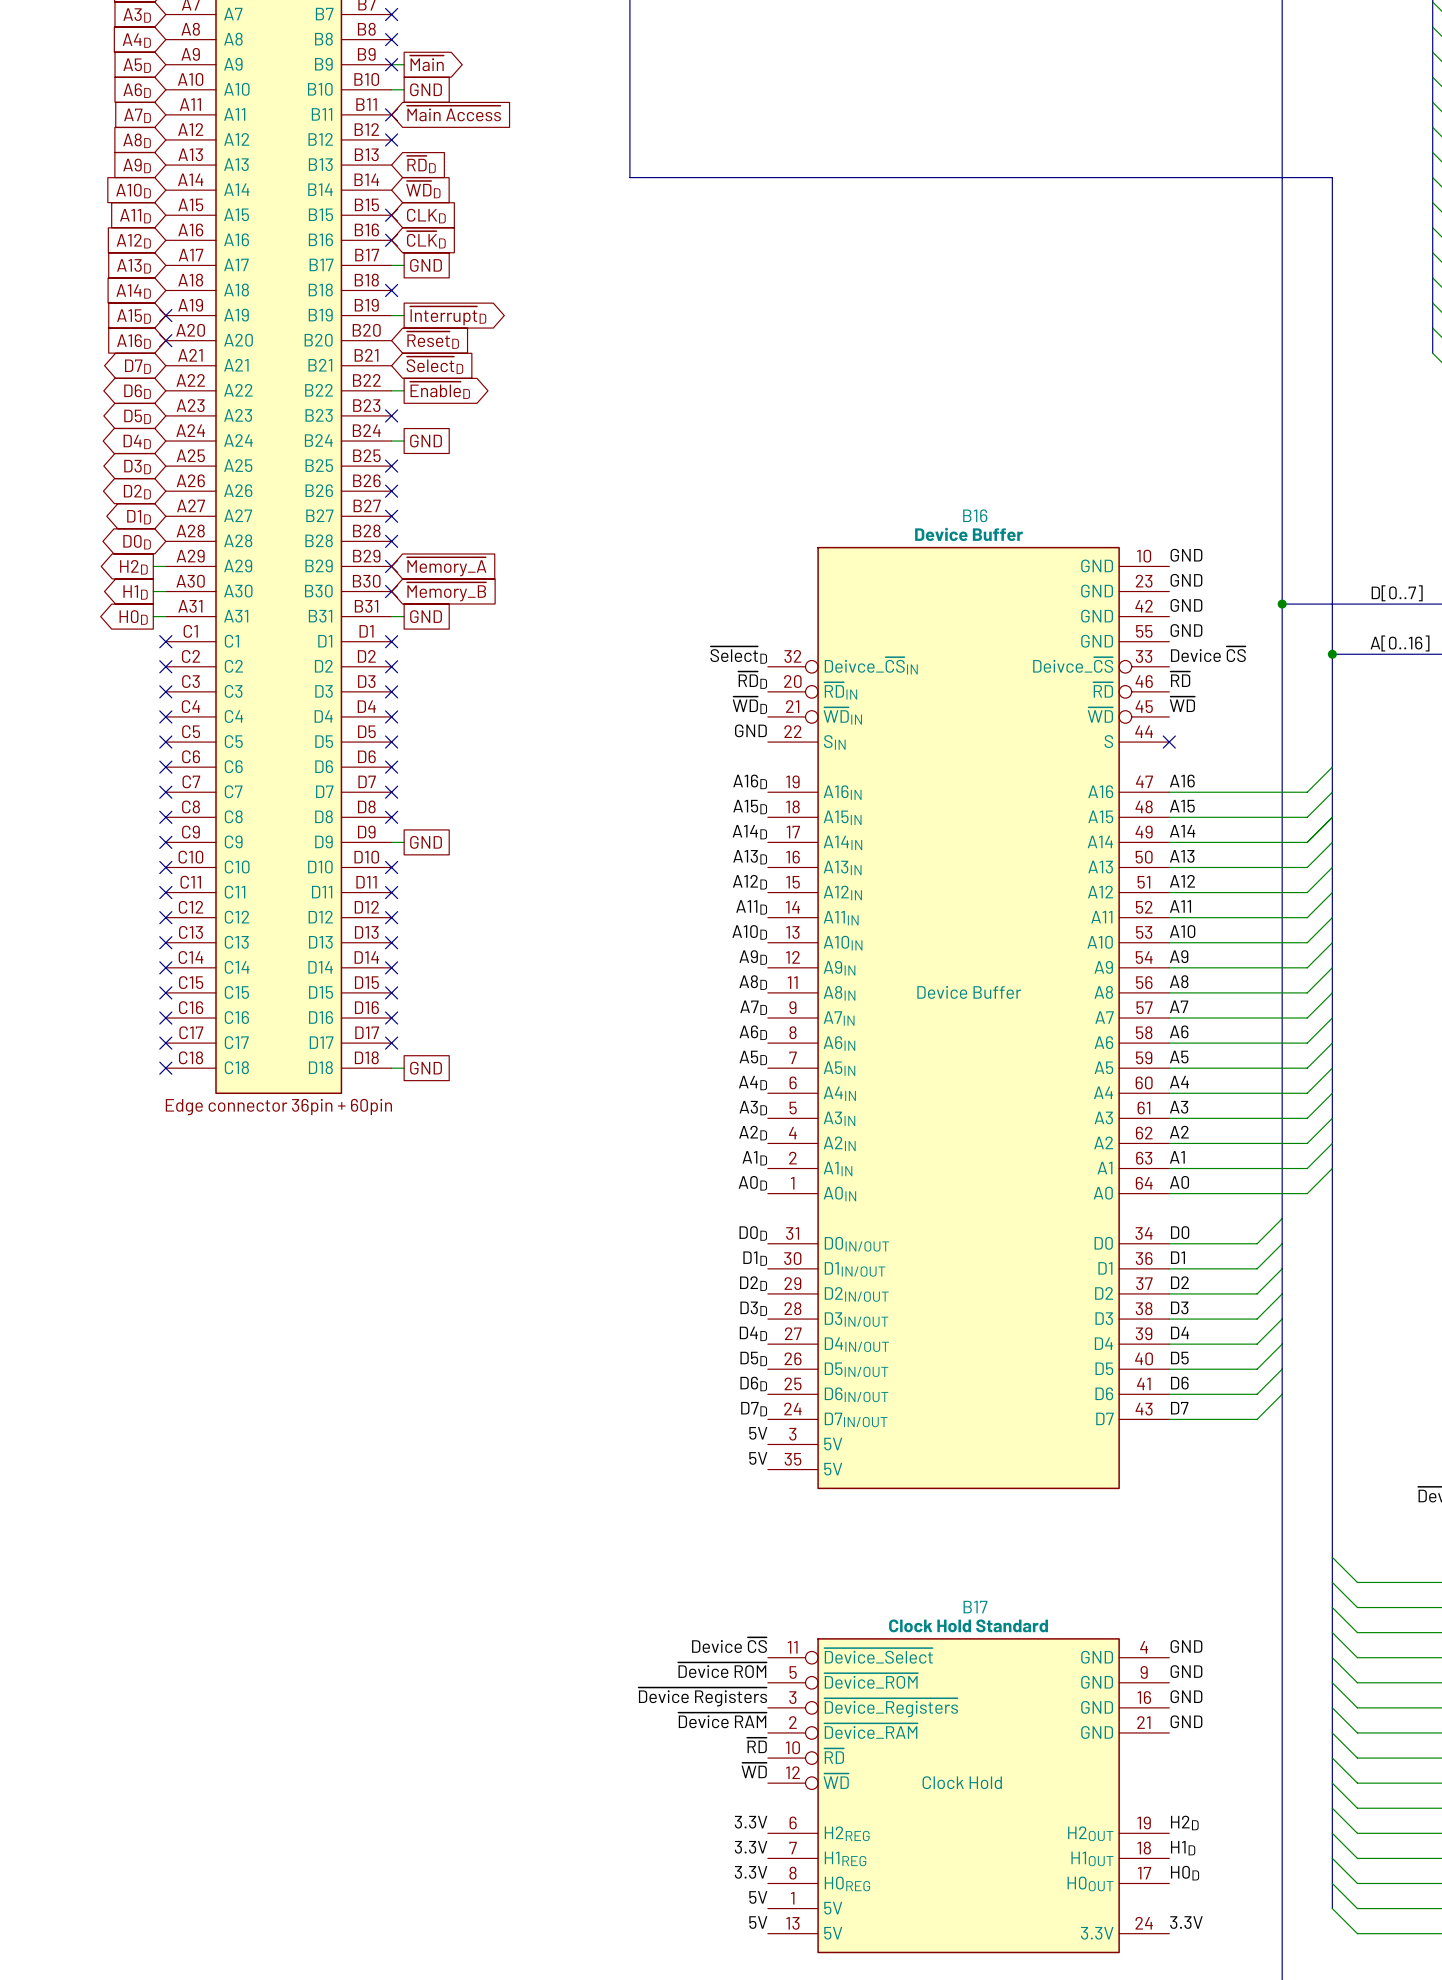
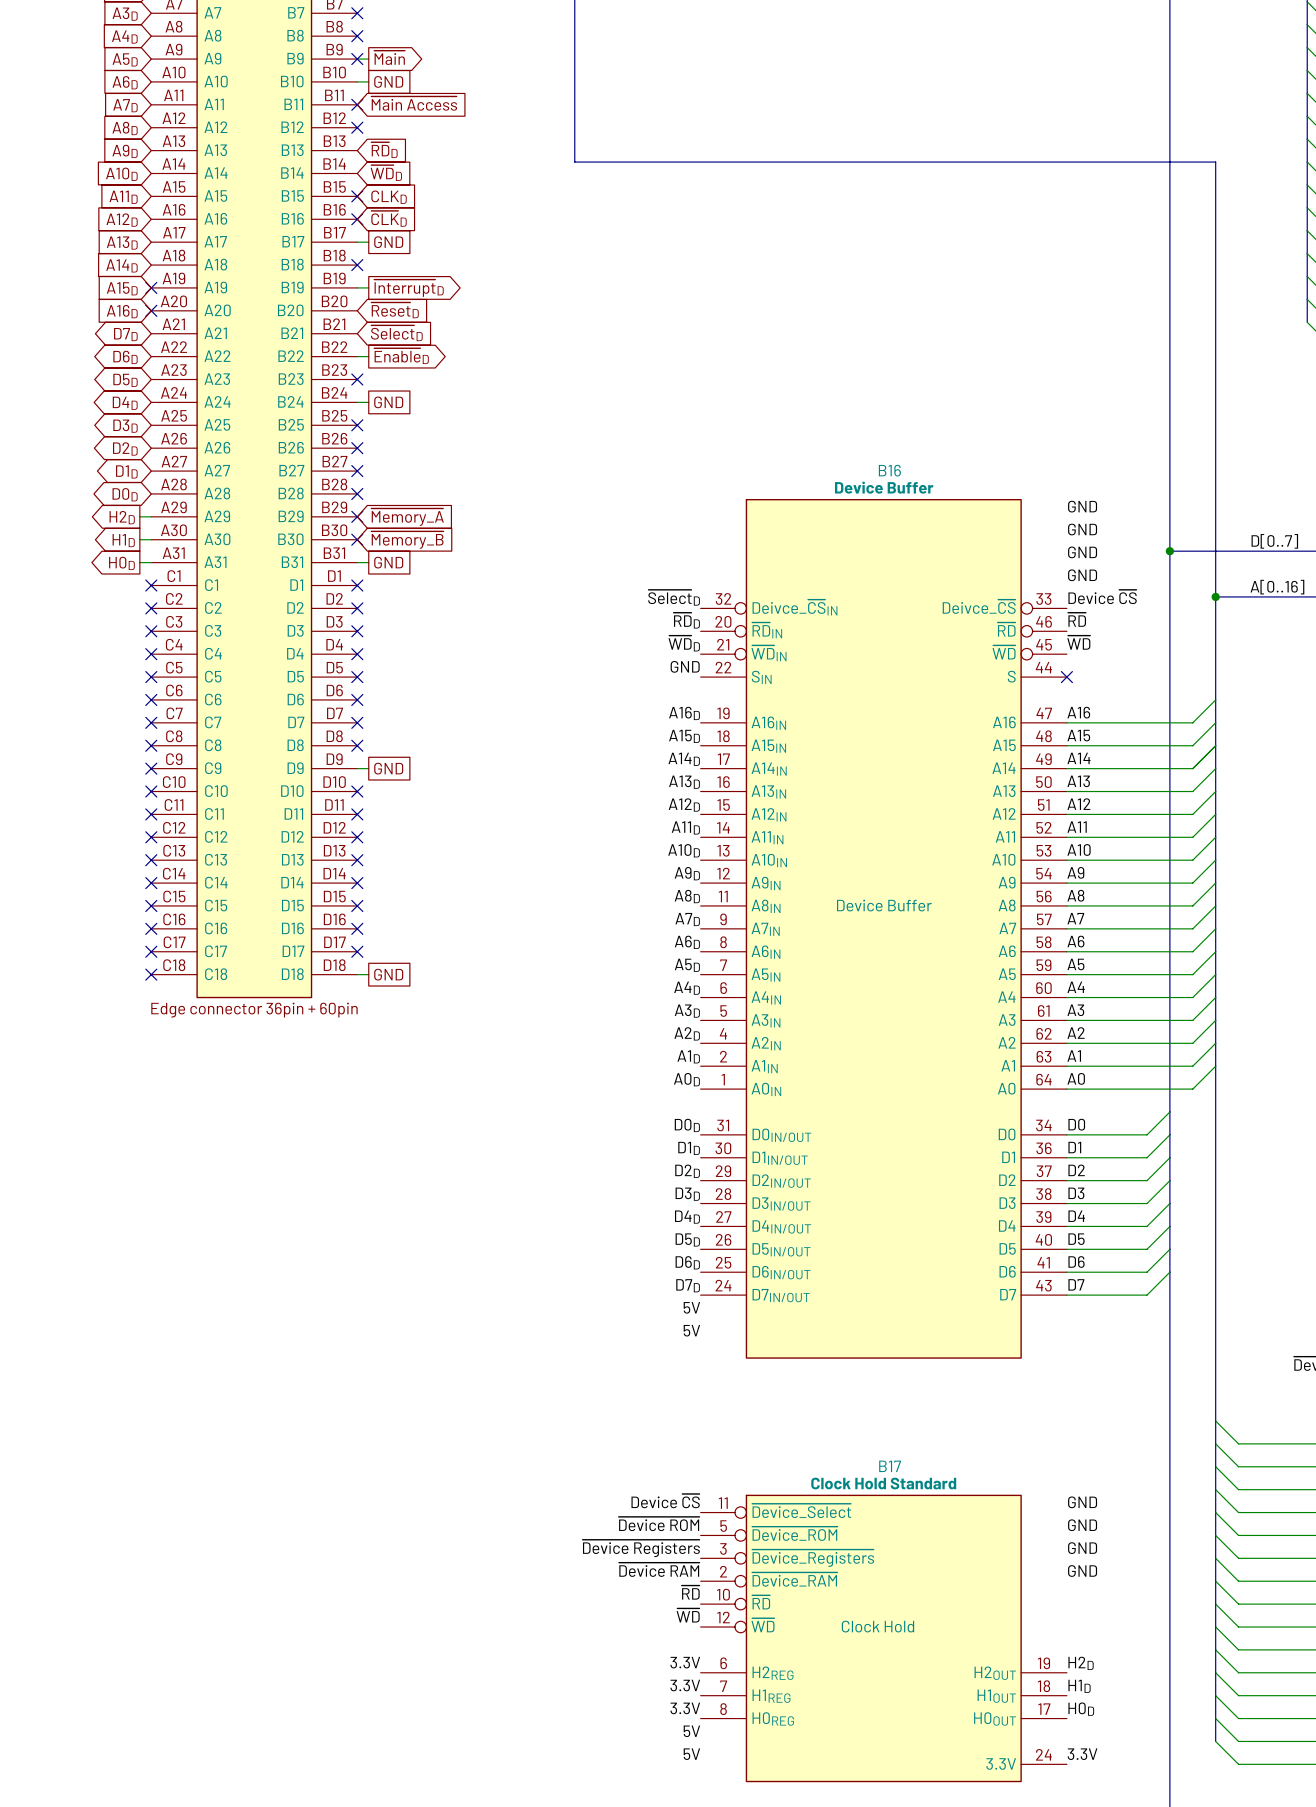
B16 symbol: [767, 546, 1170, 1490] -> [700, 498, 1067, 1359]
B17 symbol: [767, 1638, 1170, 1954] -> [700, 1494, 1067, 1783]

